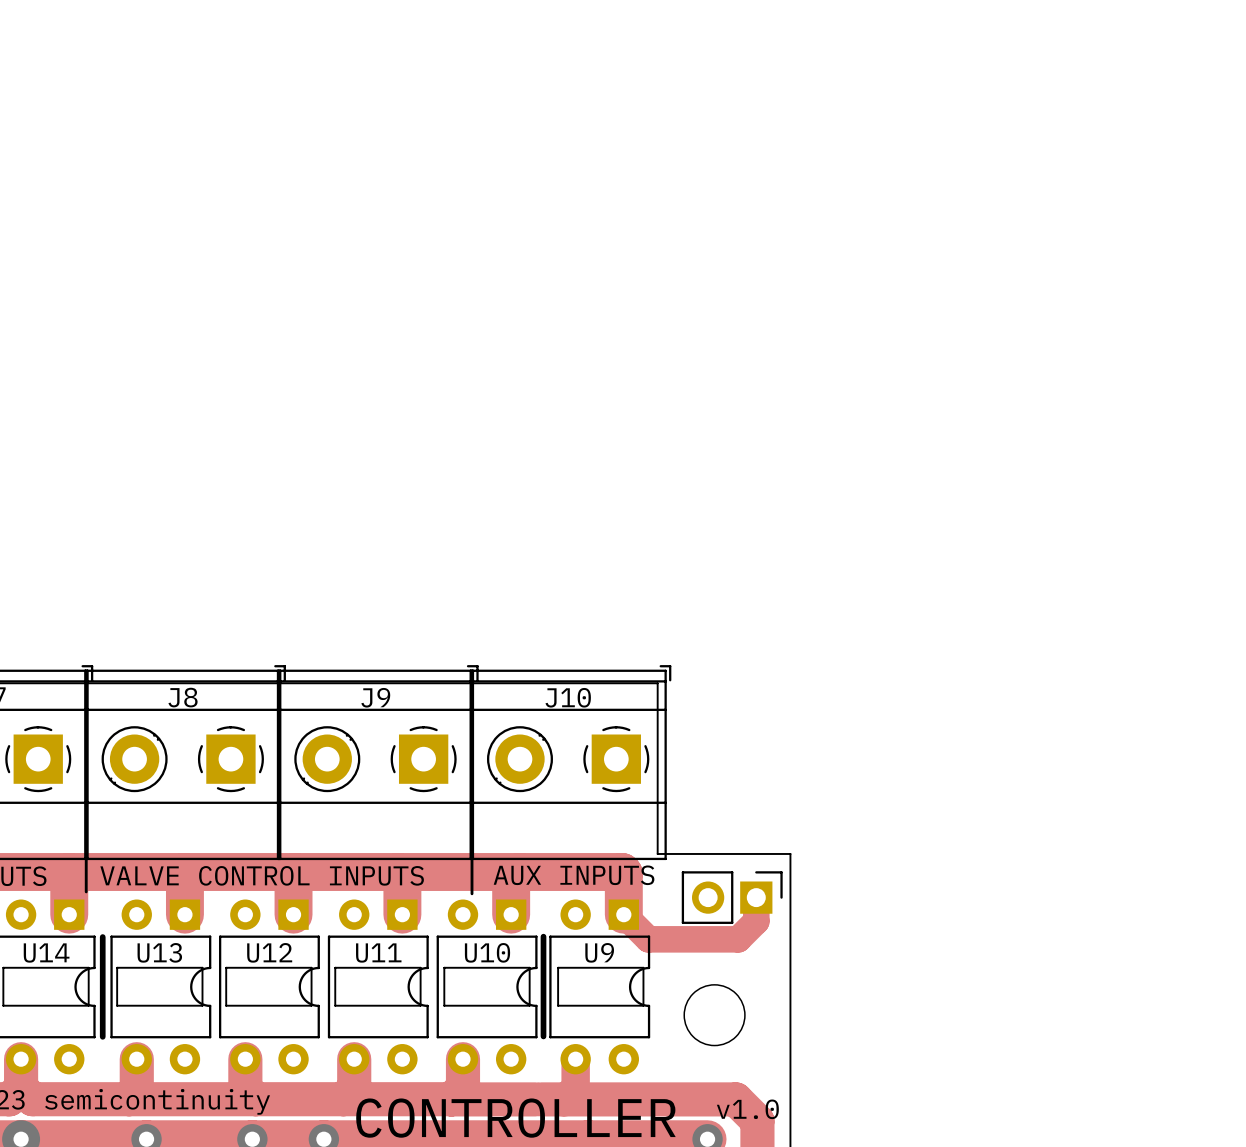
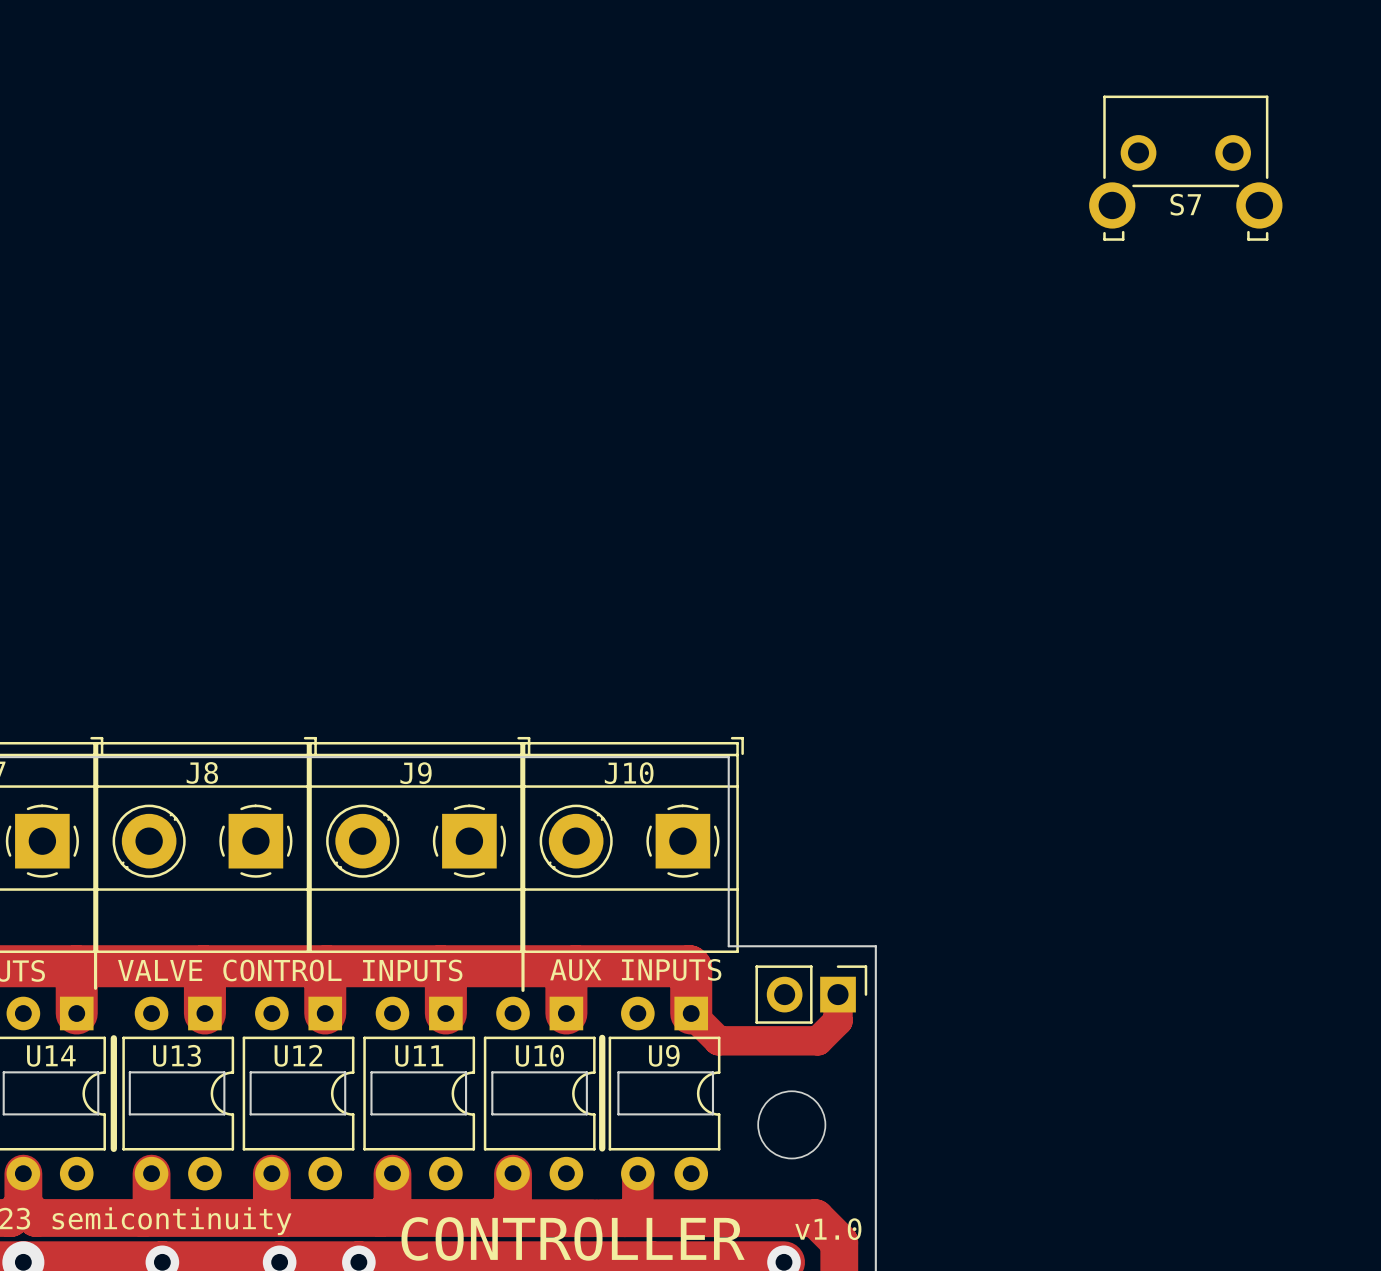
S7: none -> (1185, 168)

